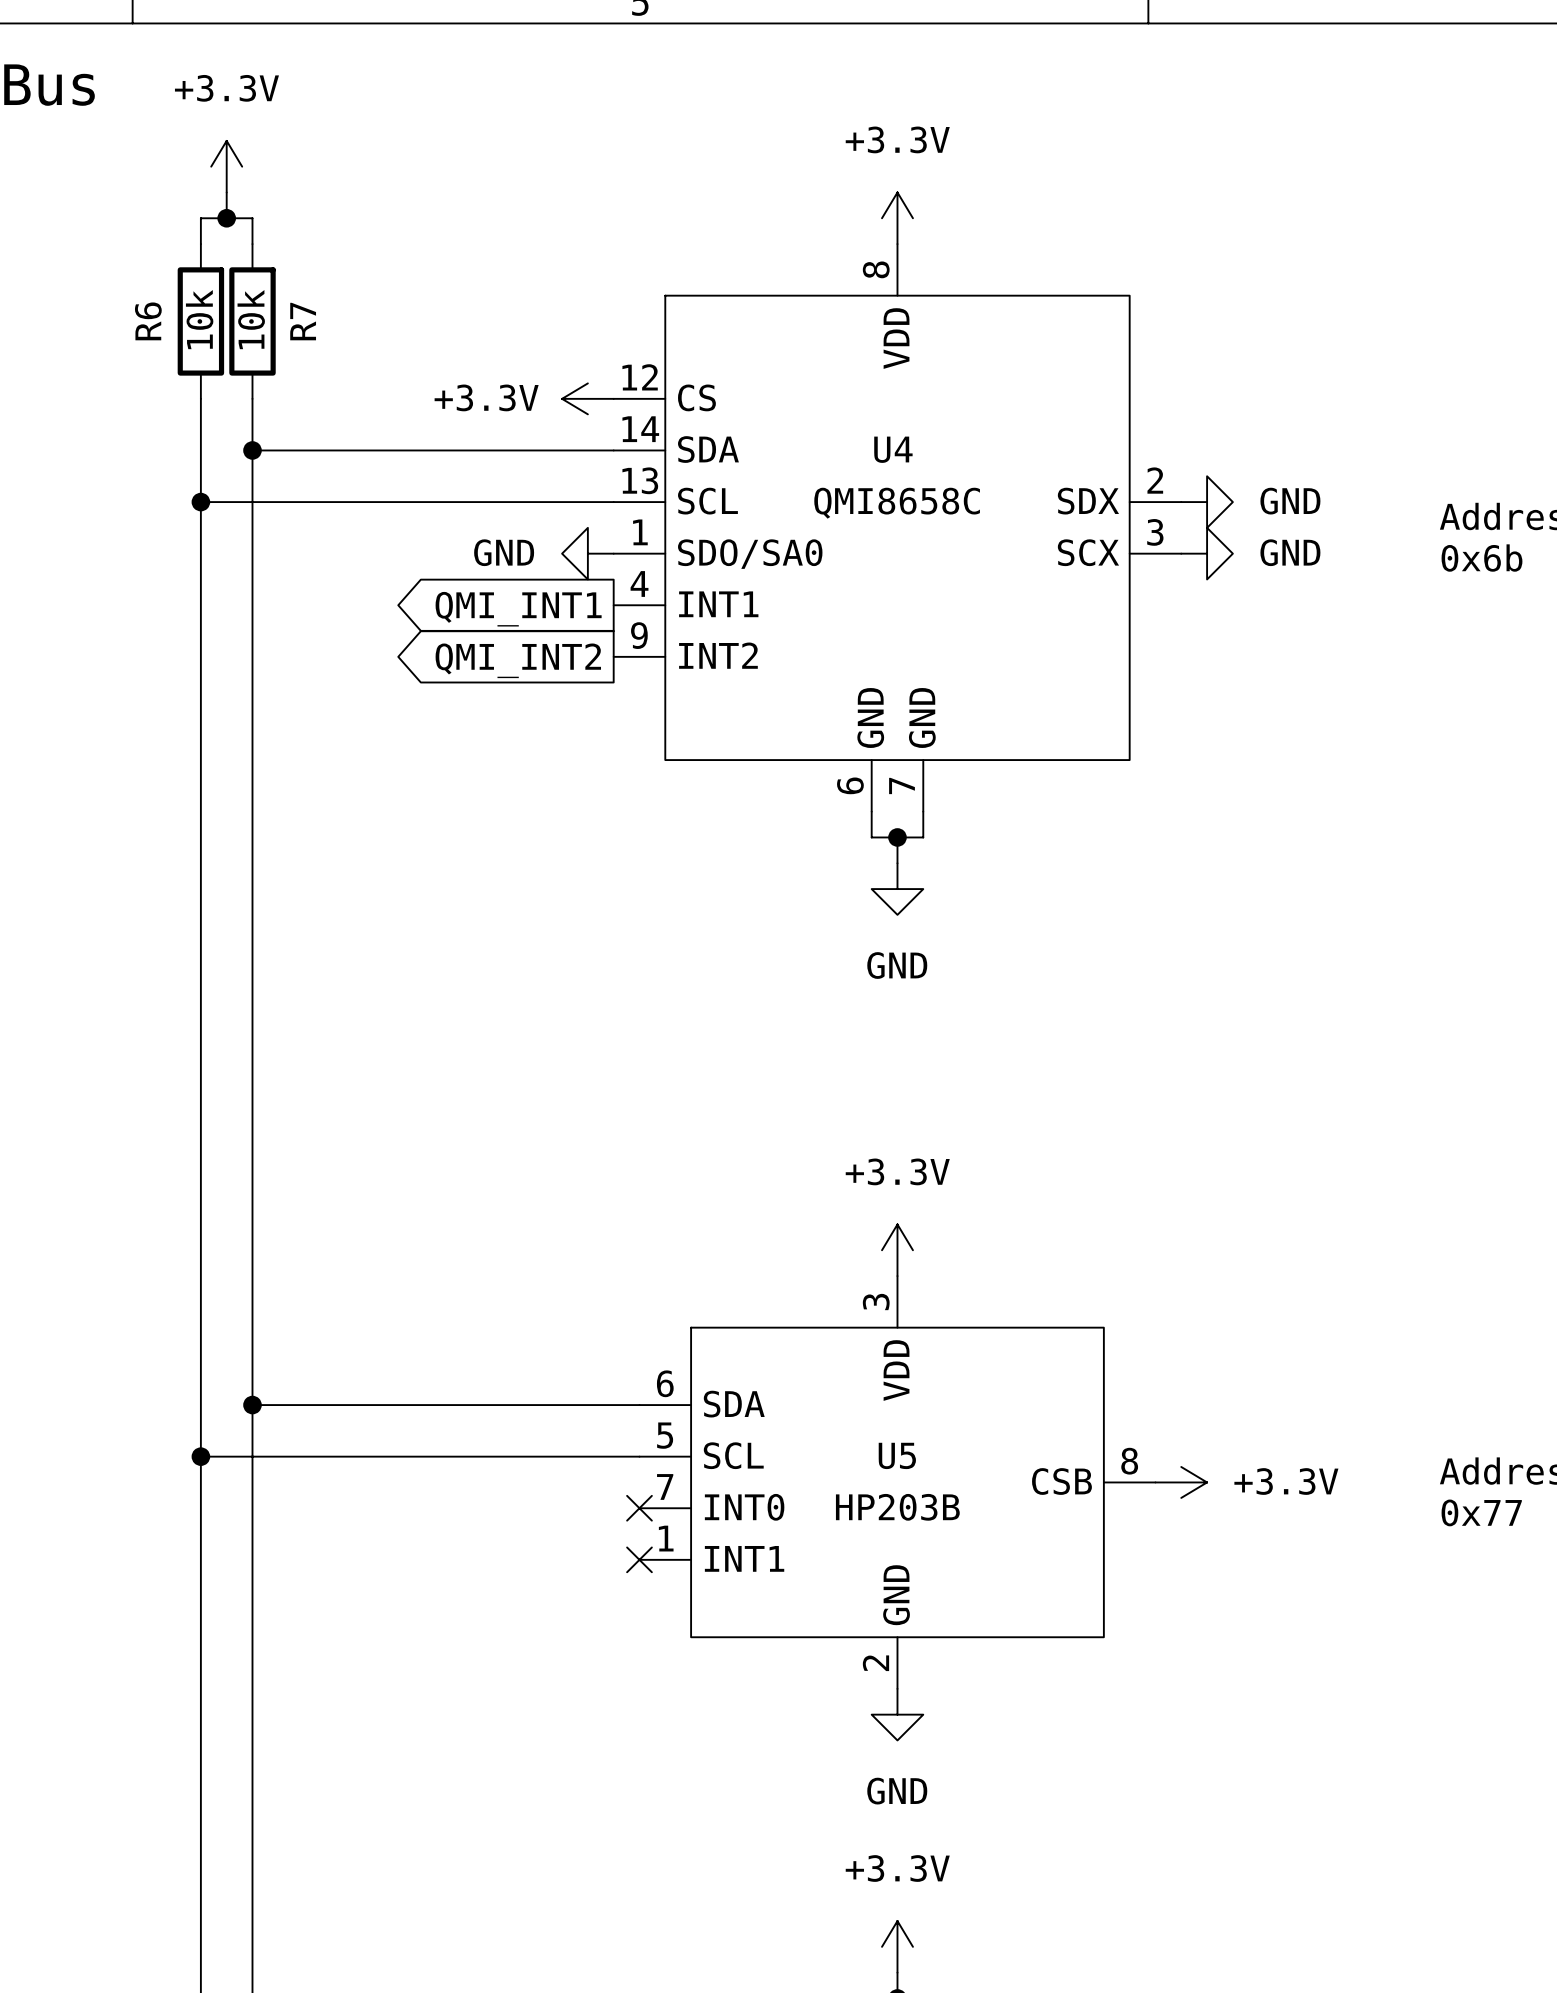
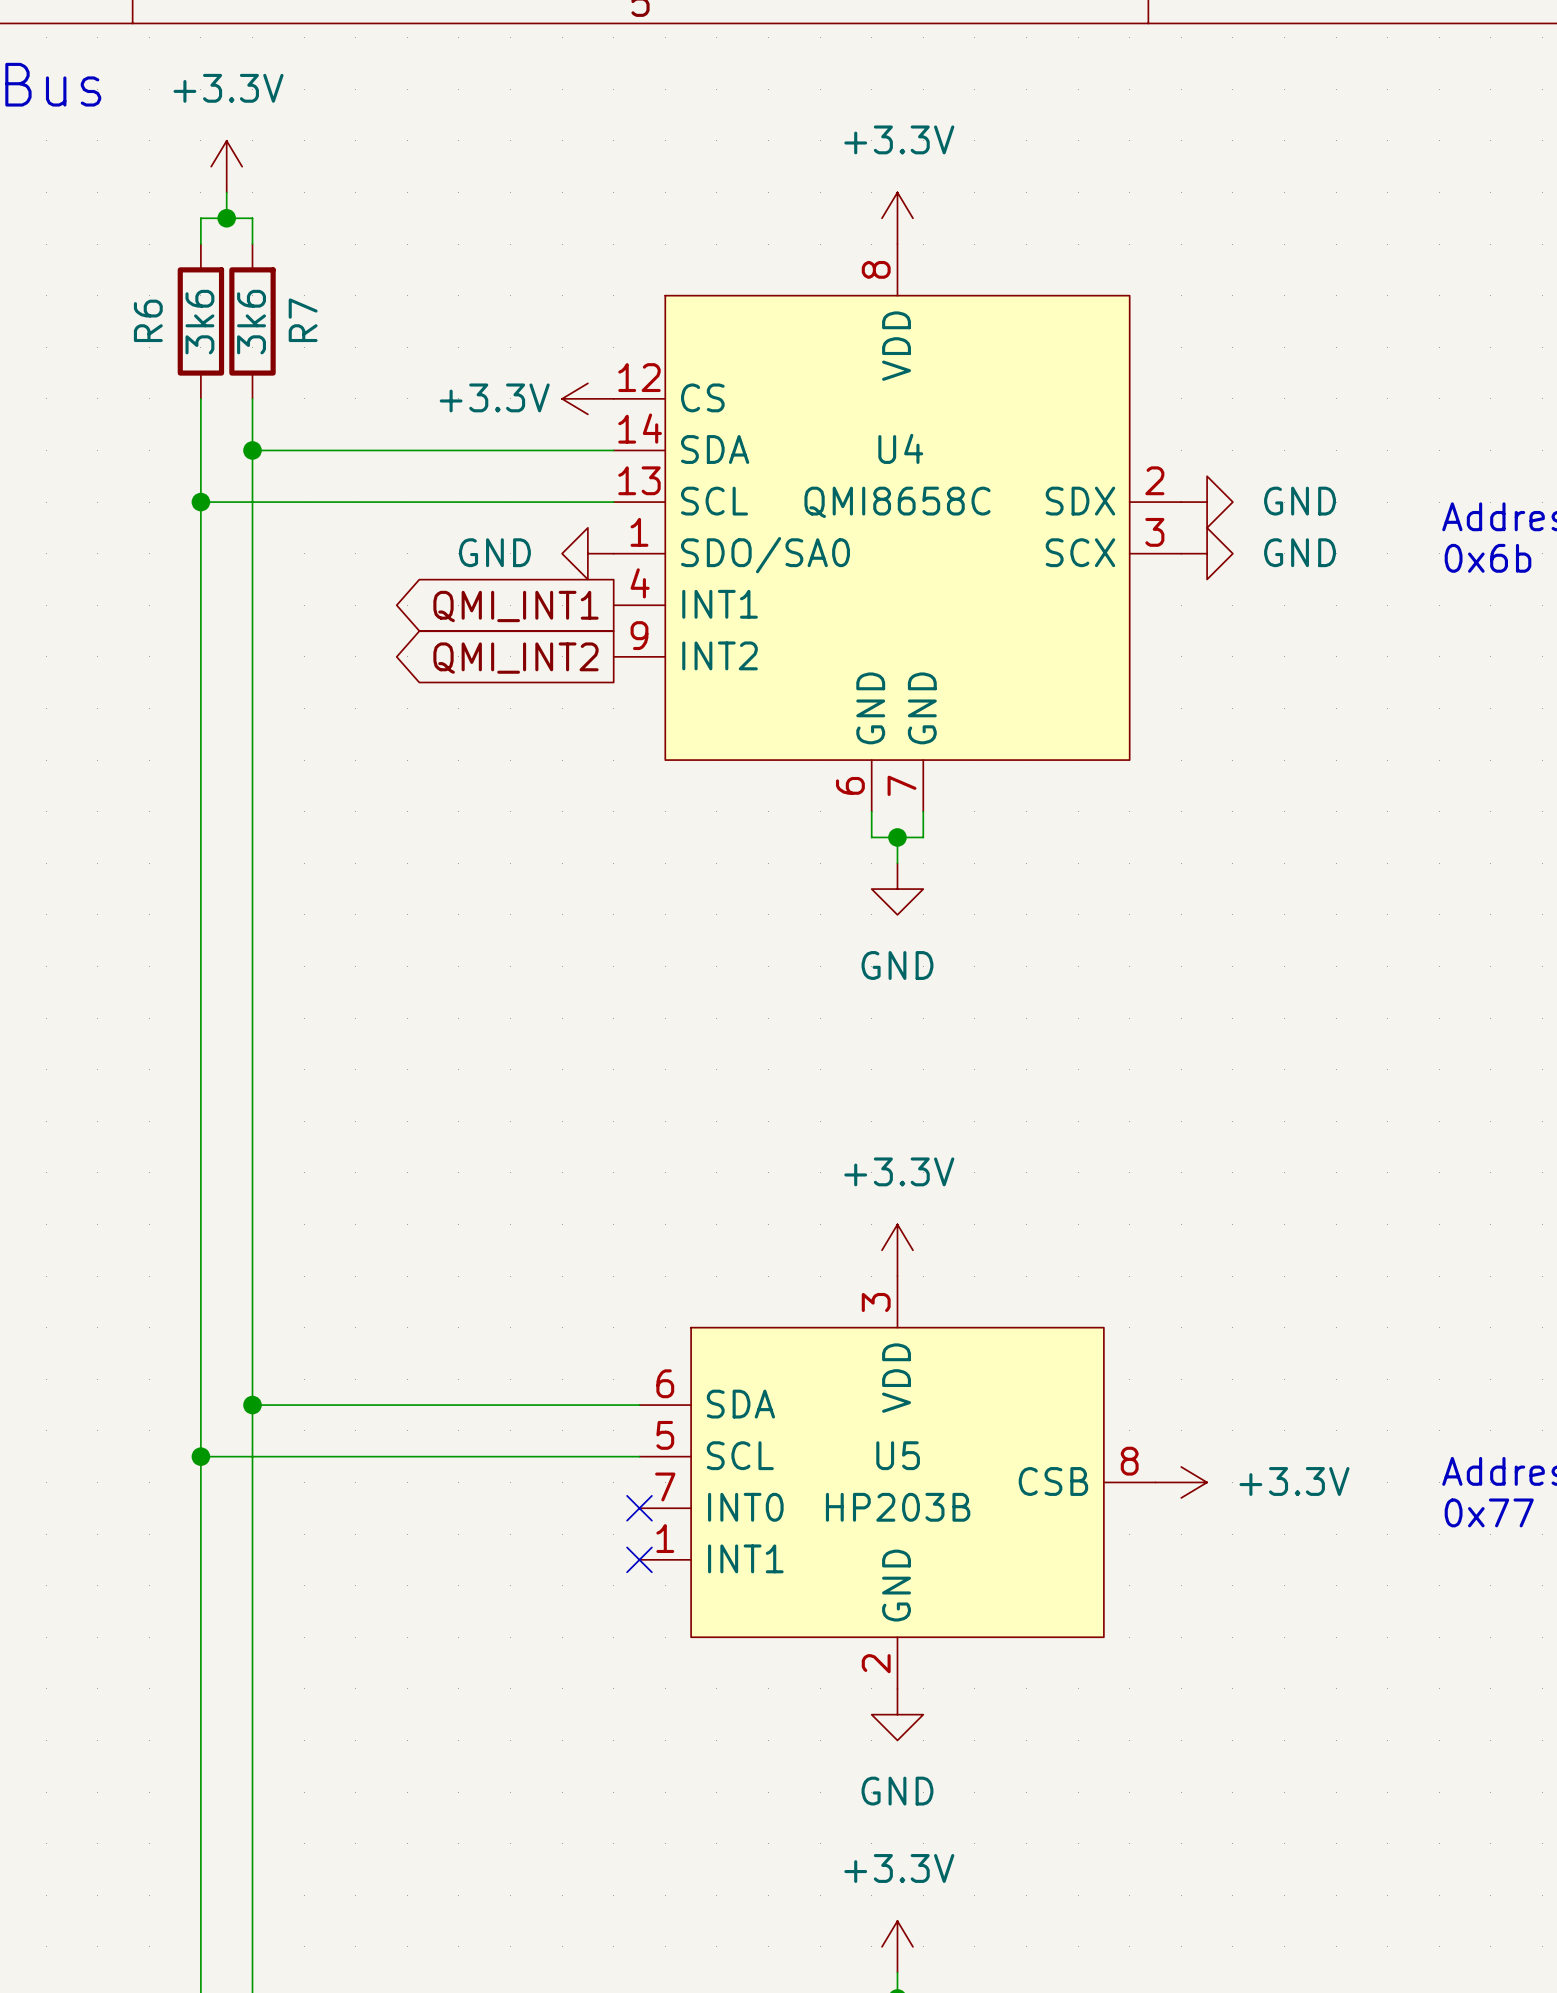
R6 value: 10k (199, 319) -> 3k6 (199, 322)
R7 value: 10k (251, 319) -> 3k6 (251, 322)

